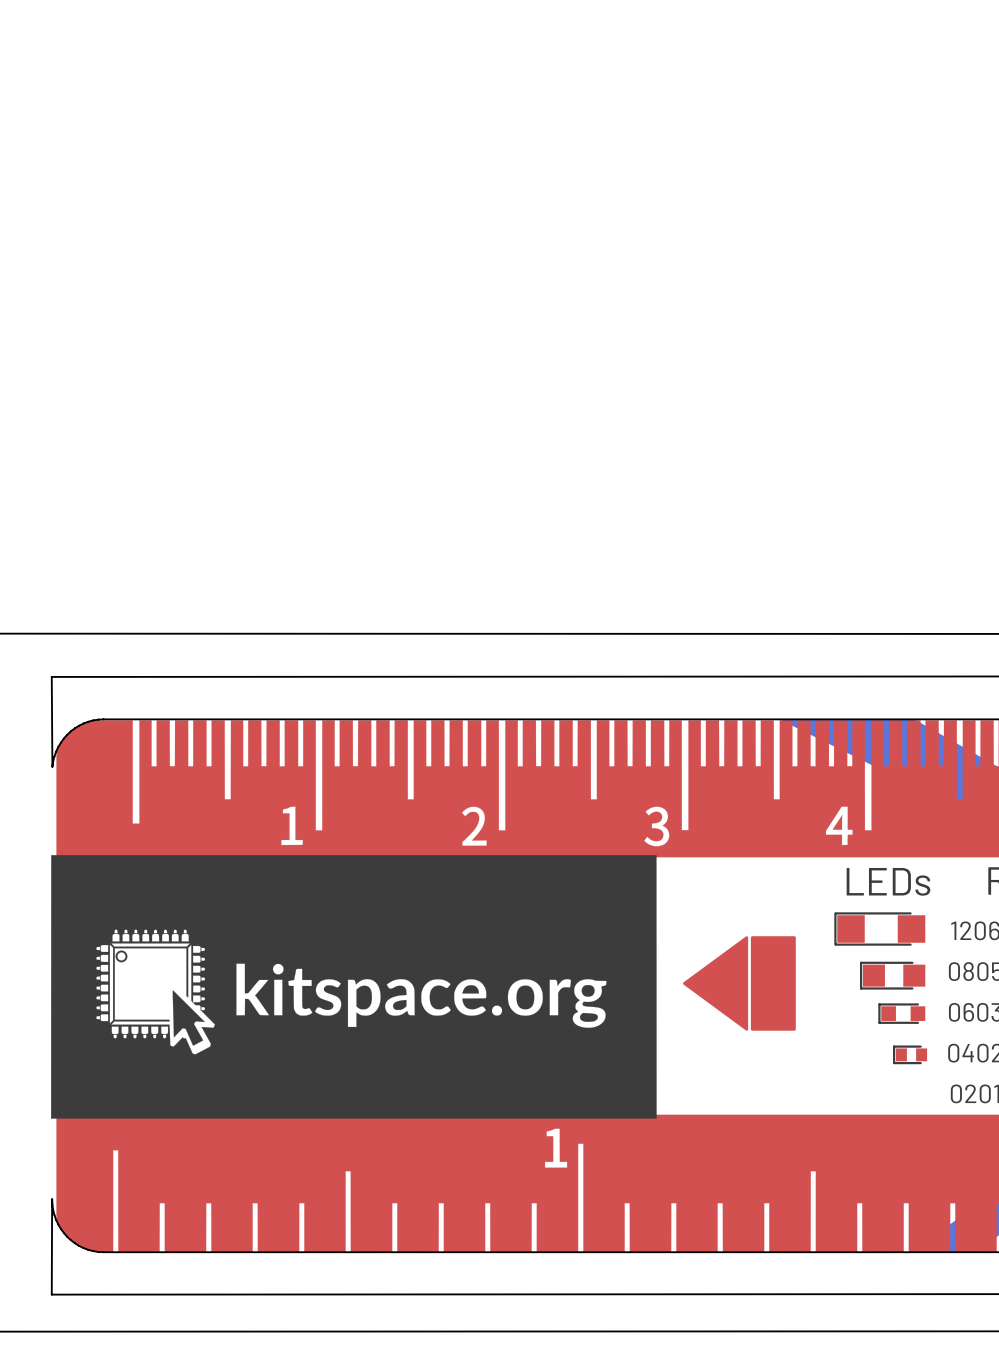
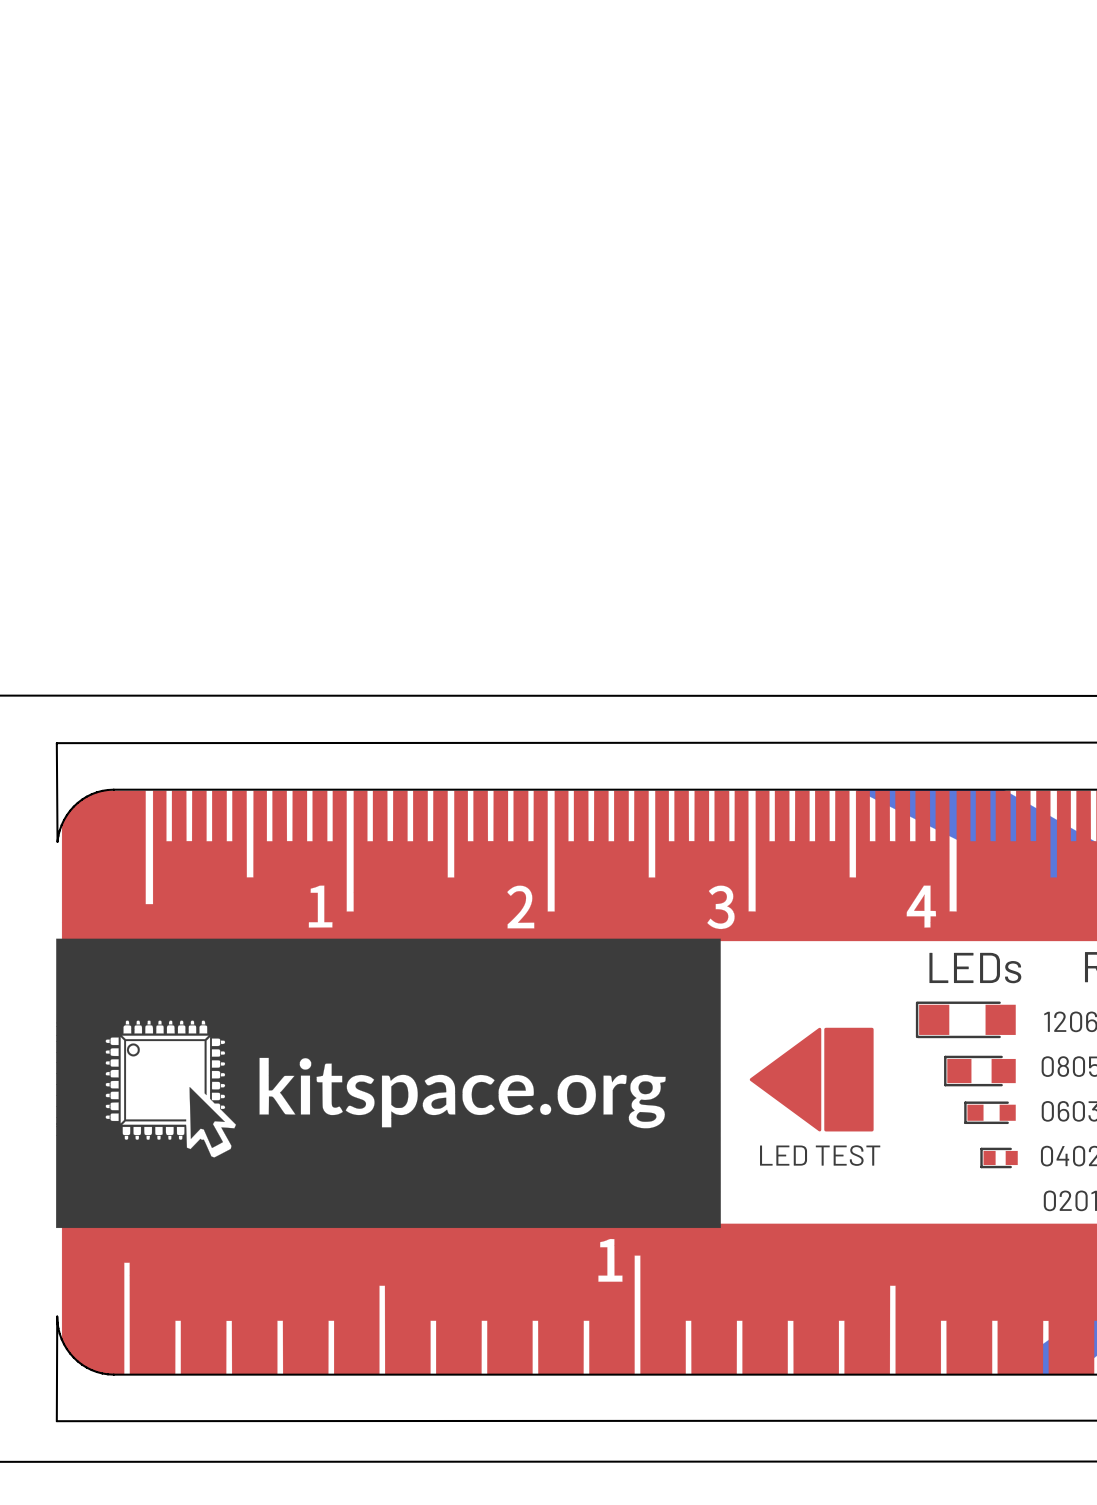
part text: none -> LED TEST (820, 1155)

